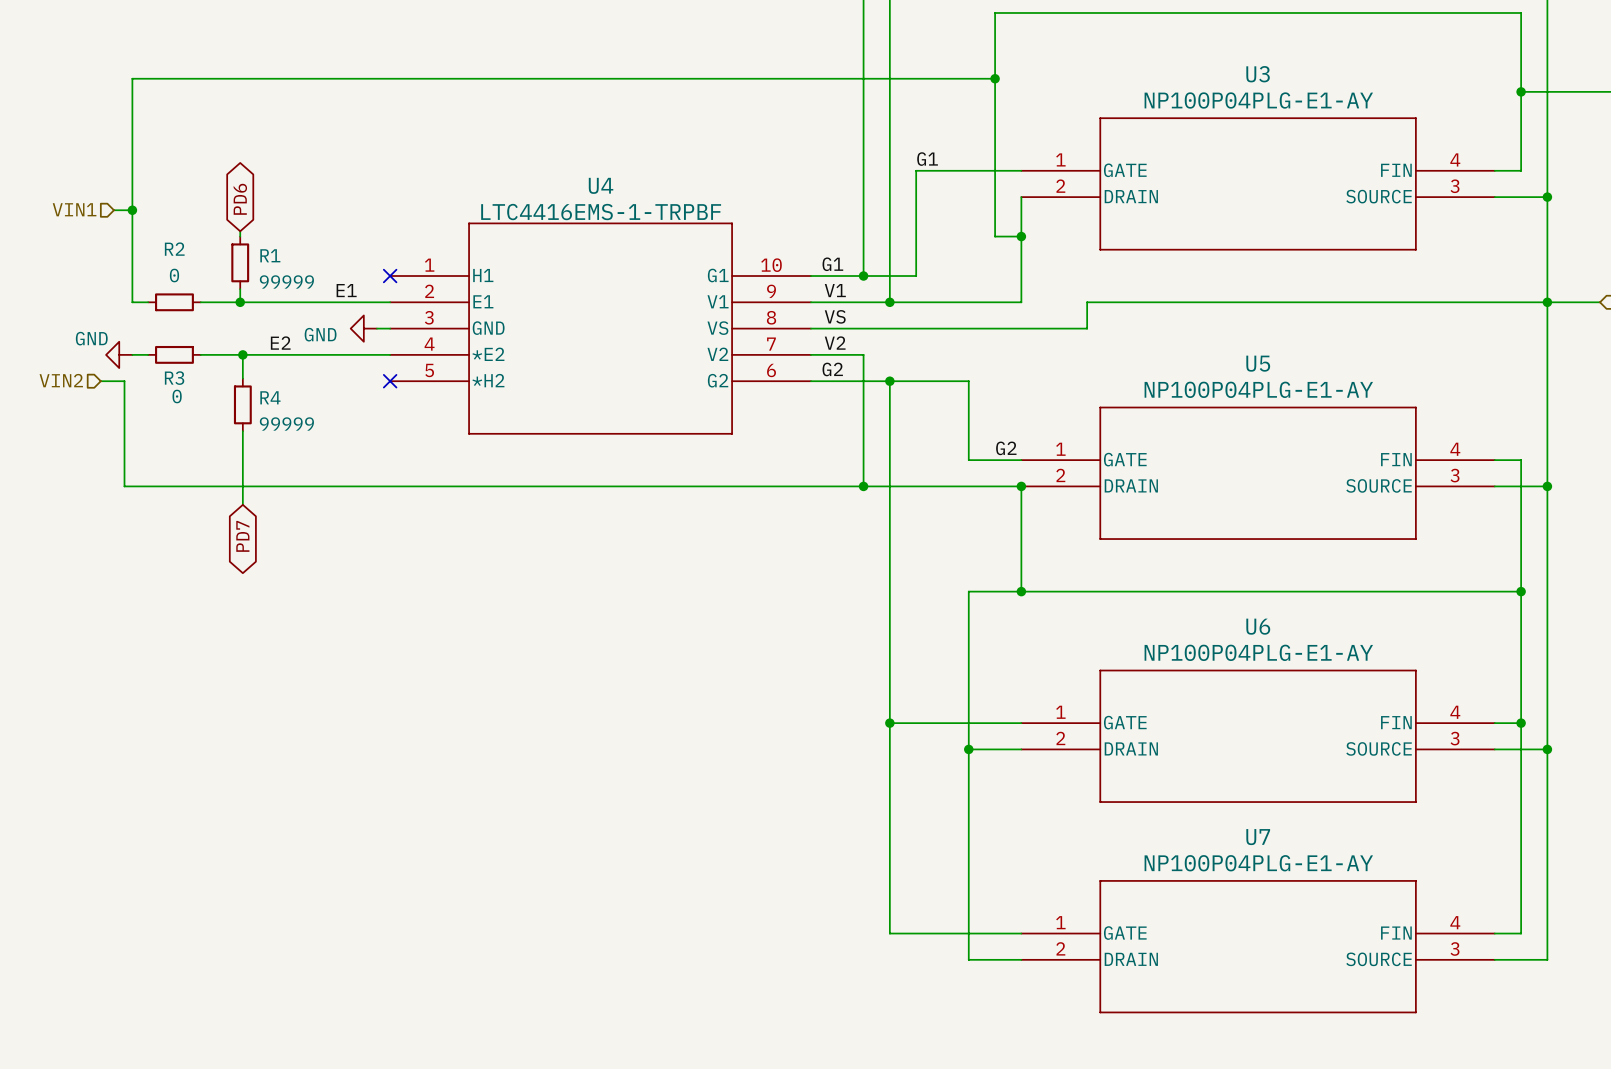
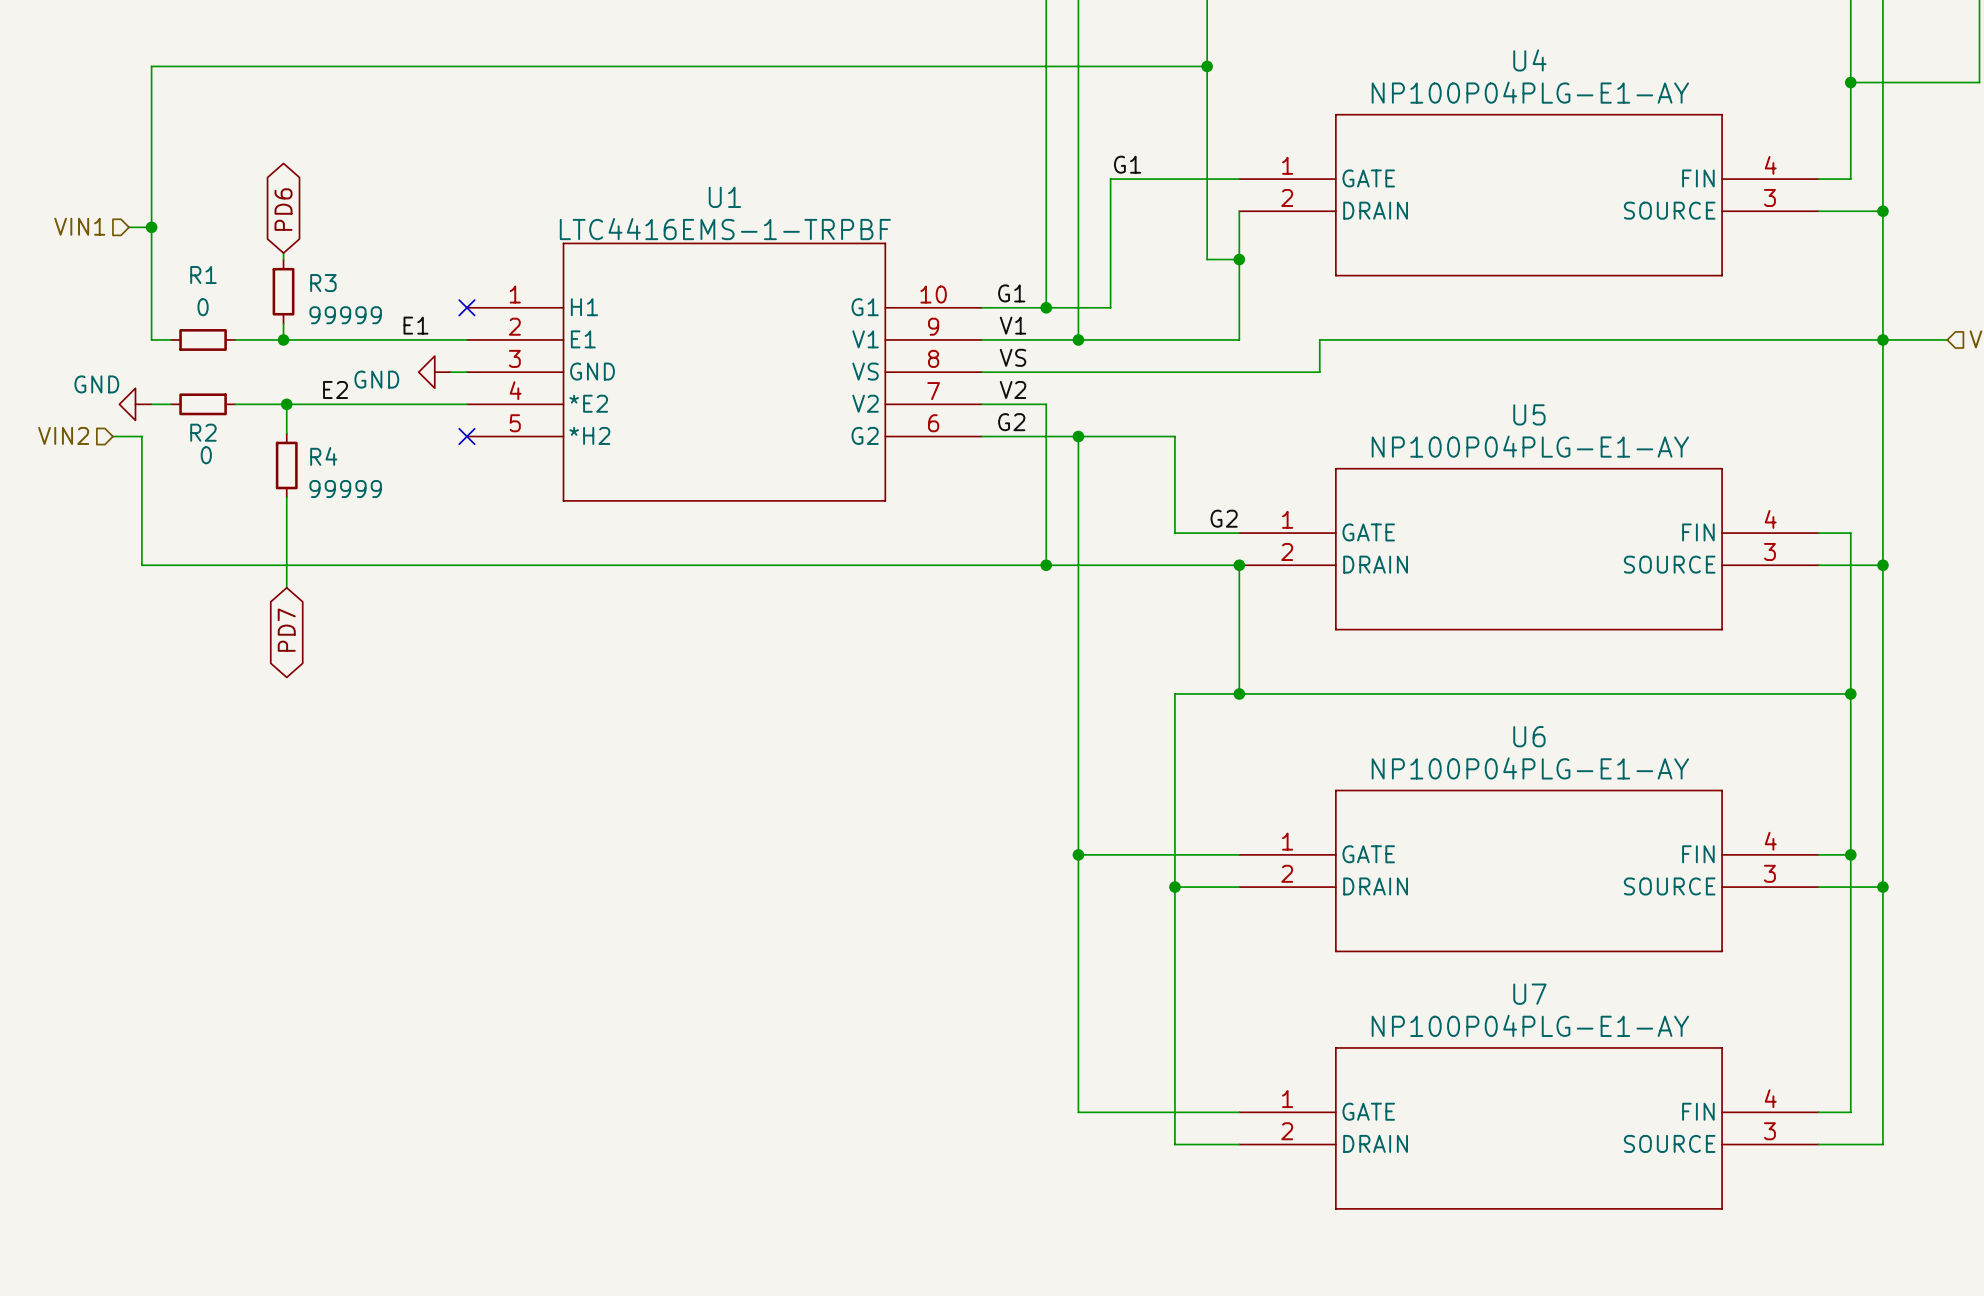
U3 name: U3 (1258, 74) -> U4 (1529, 60)
U4 name: U4 (601, 185) -> U1 (724, 197)
R2 name: R2 (174, 249) -> R1 (203, 275)
R1 name: R1 (270, 255) -> R3 (323, 283)
R3 name: R3 (174, 378) -> R2 (203, 432)

